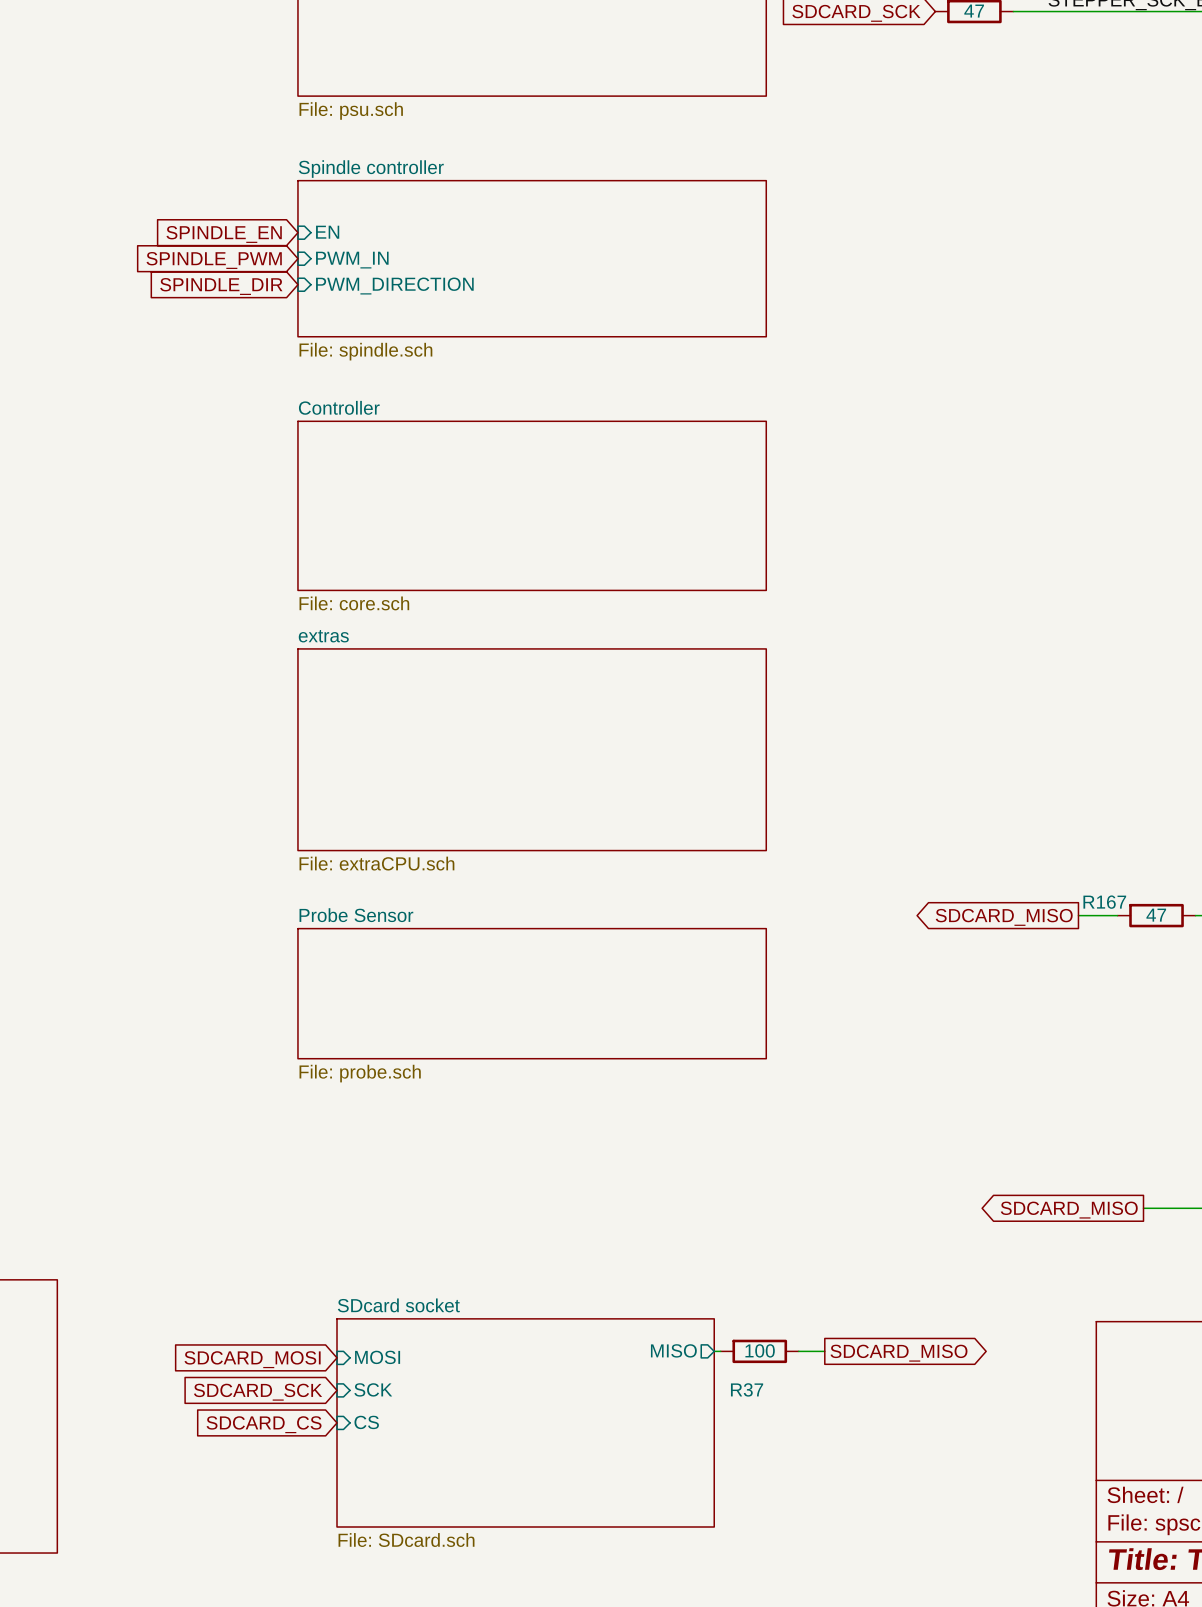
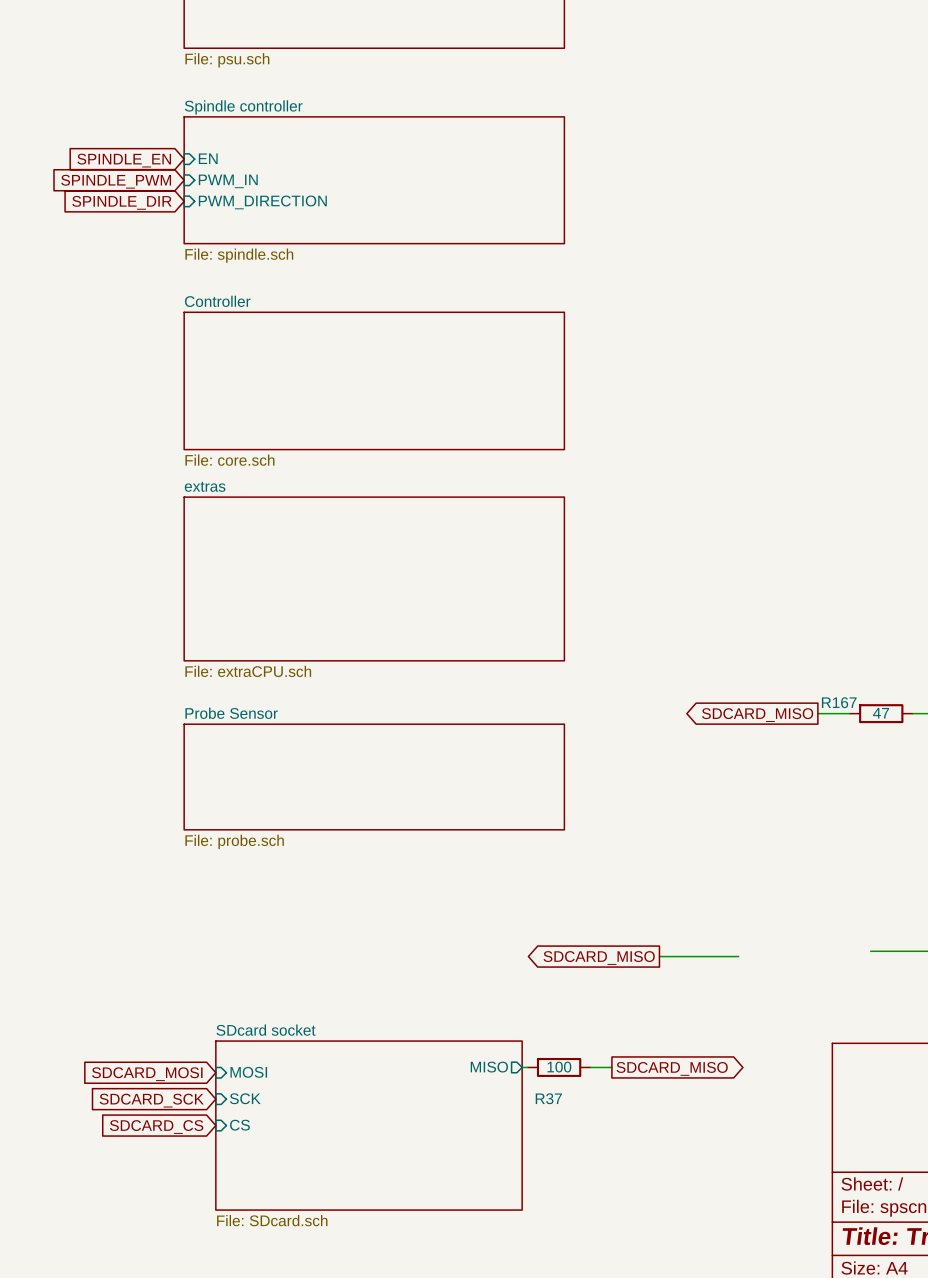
global label: SDCARD_MISO (1069, 1210) -> none
wire: none -> (659, 956) (738, 956)
global label: none -> SDCARD_MISO (599, 958)

